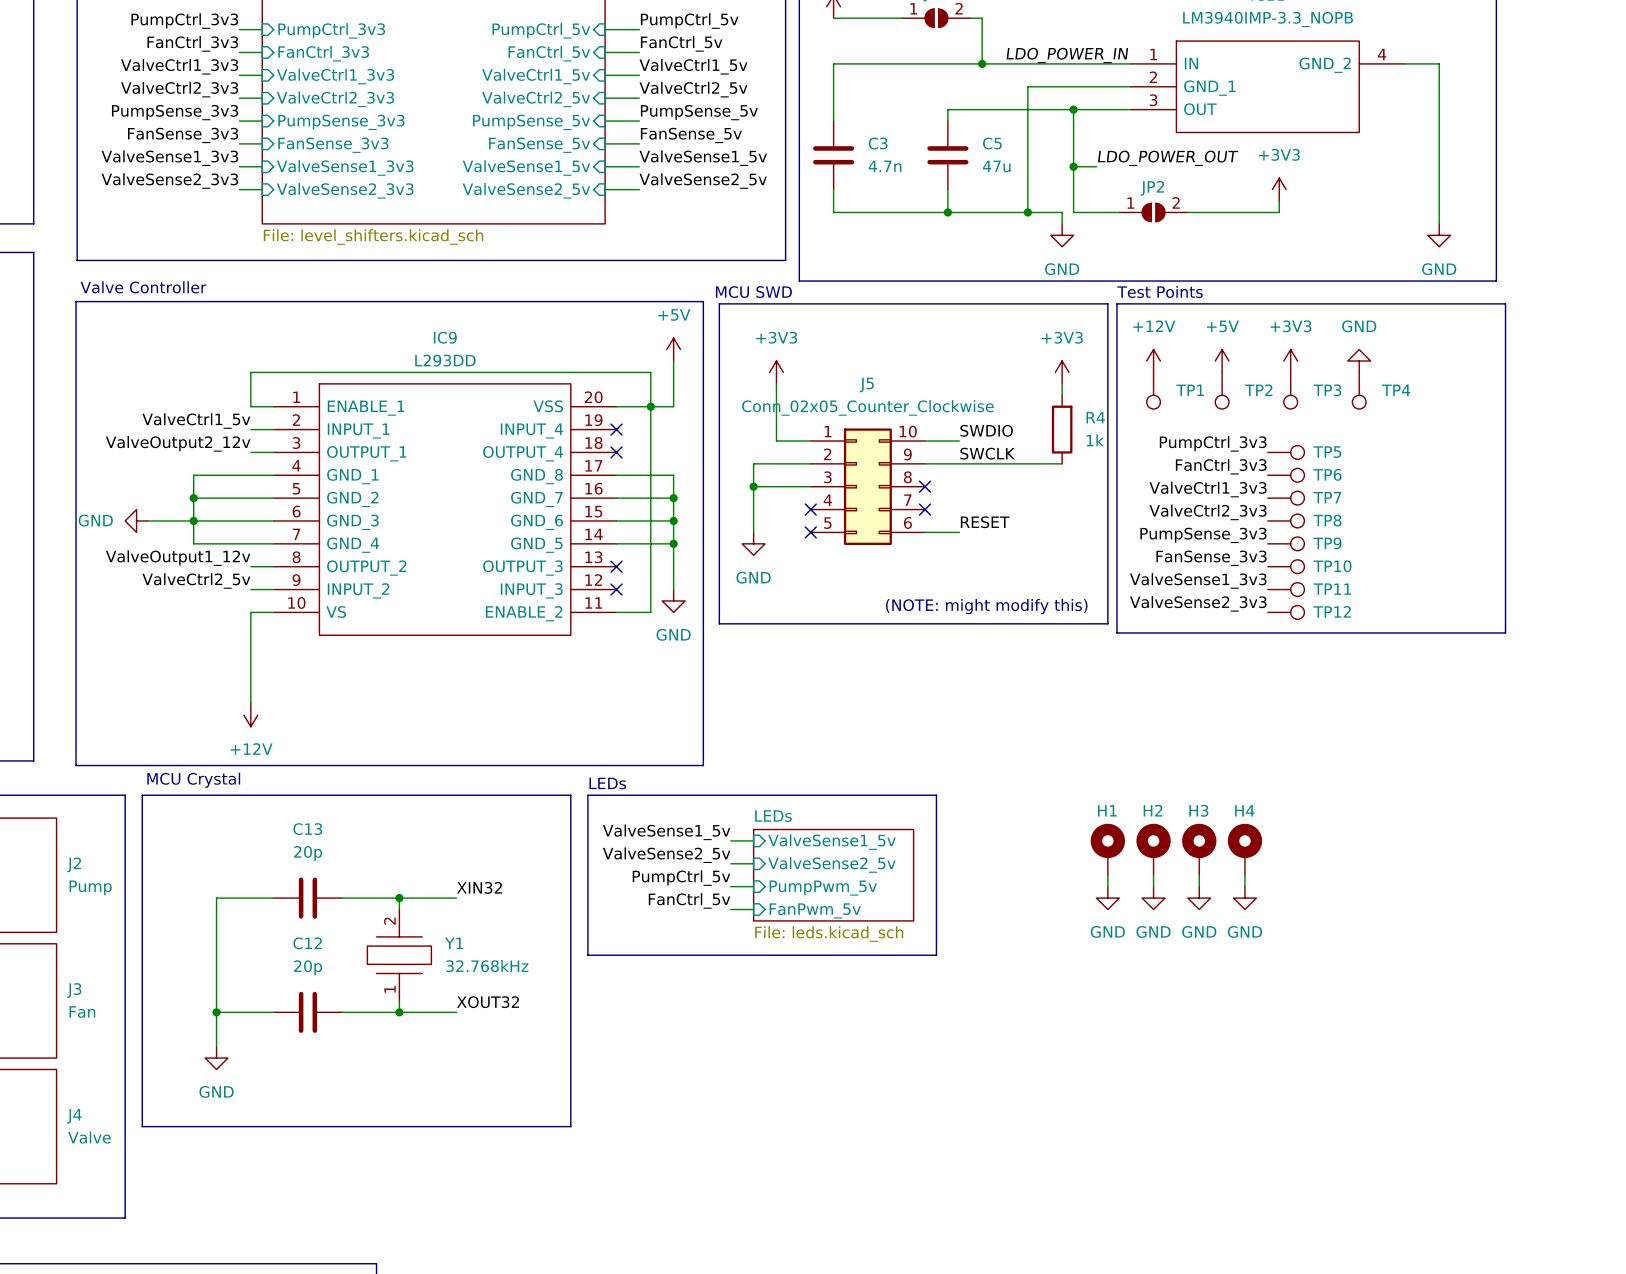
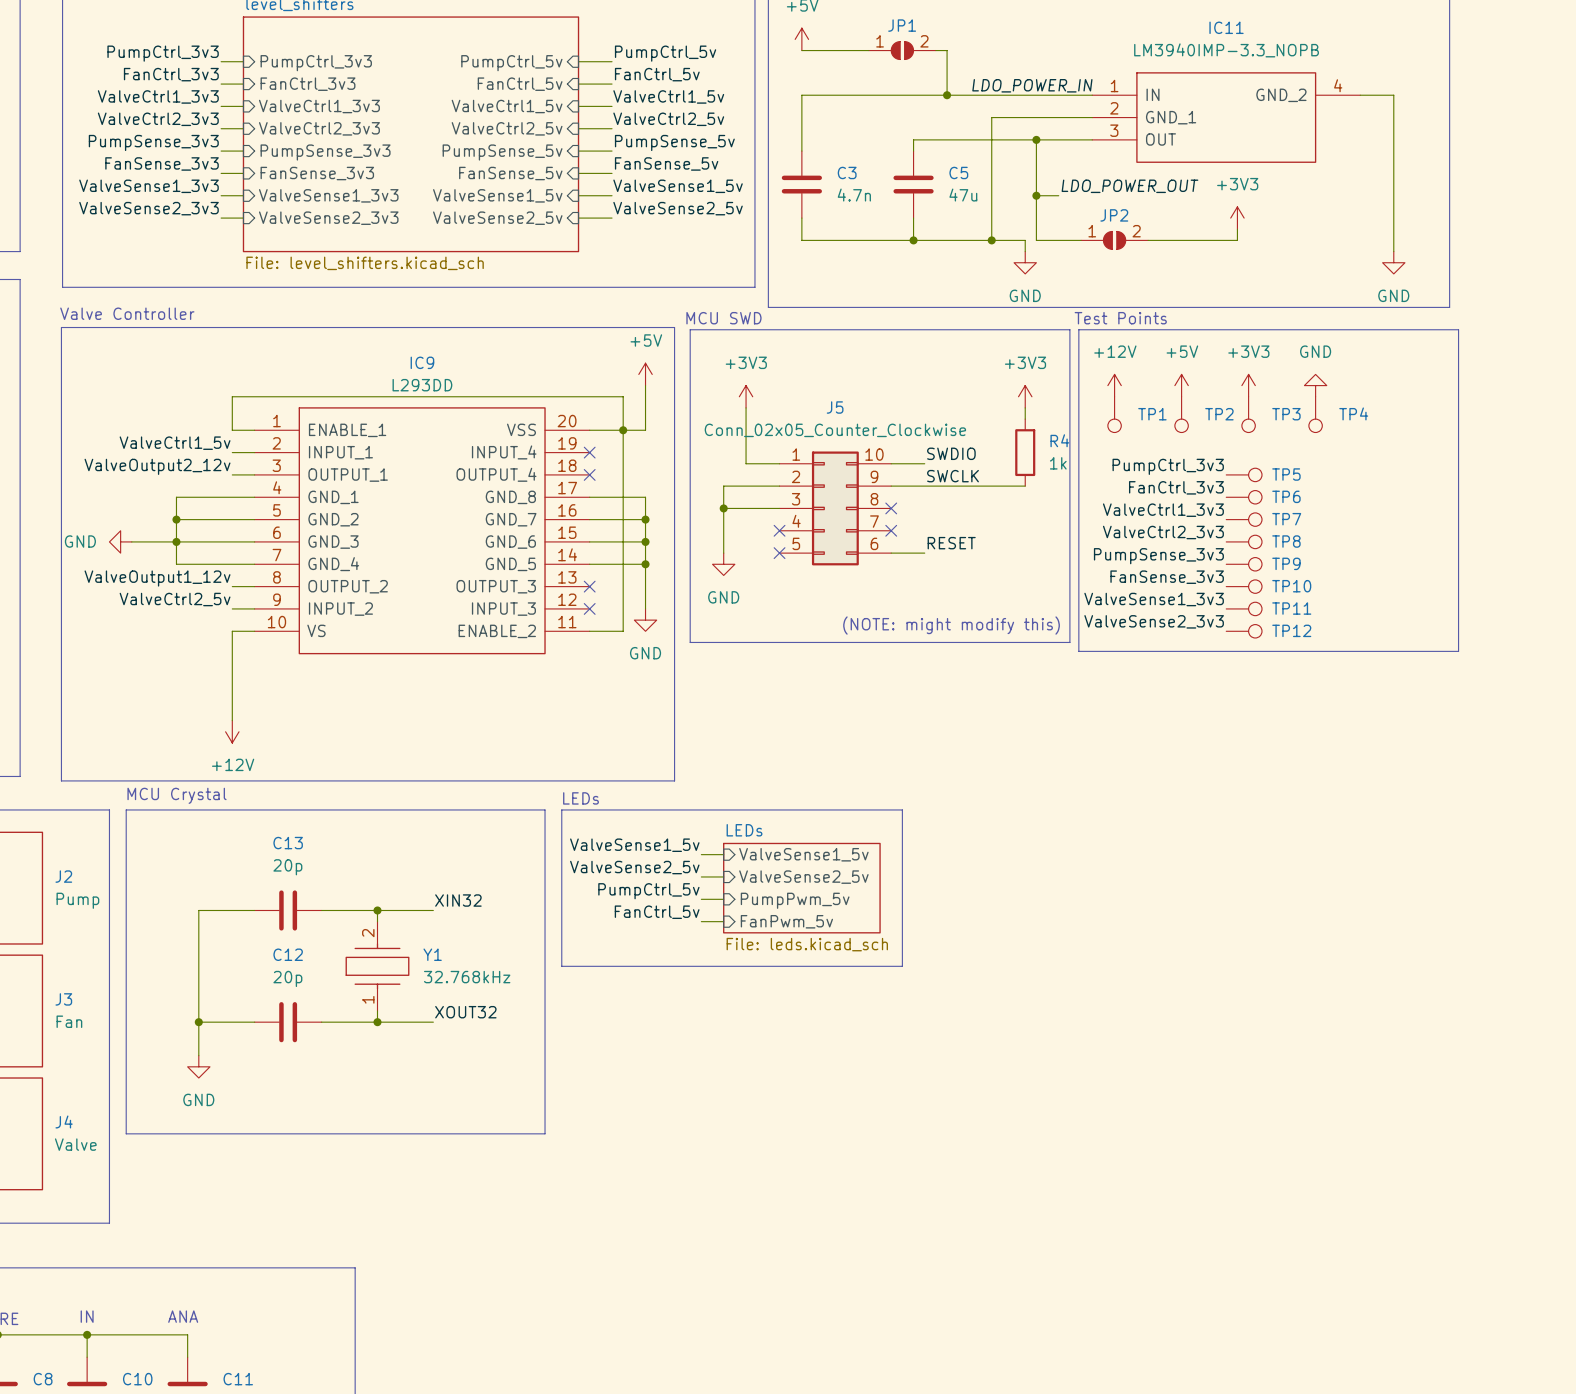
H1: (1107, 849) -> none
H2: (1153, 849) -> none
H3: (1199, 849) -> none
H4: (1244, 849) -> none
wire: (1107, 875) (1107, 886) -> none
wire: (1153, 875) (1153, 886) -> none
wire: (1199, 875) (1199, 886) -> none
wire: (1244, 875) (1244, 886) -> none
power symbol: GND (1107, 898) -> none
power symbol: GND (1153, 898) -> none
power symbol: GND (1199, 898) -> none
power symbol: GND (1244, 898) -> none

